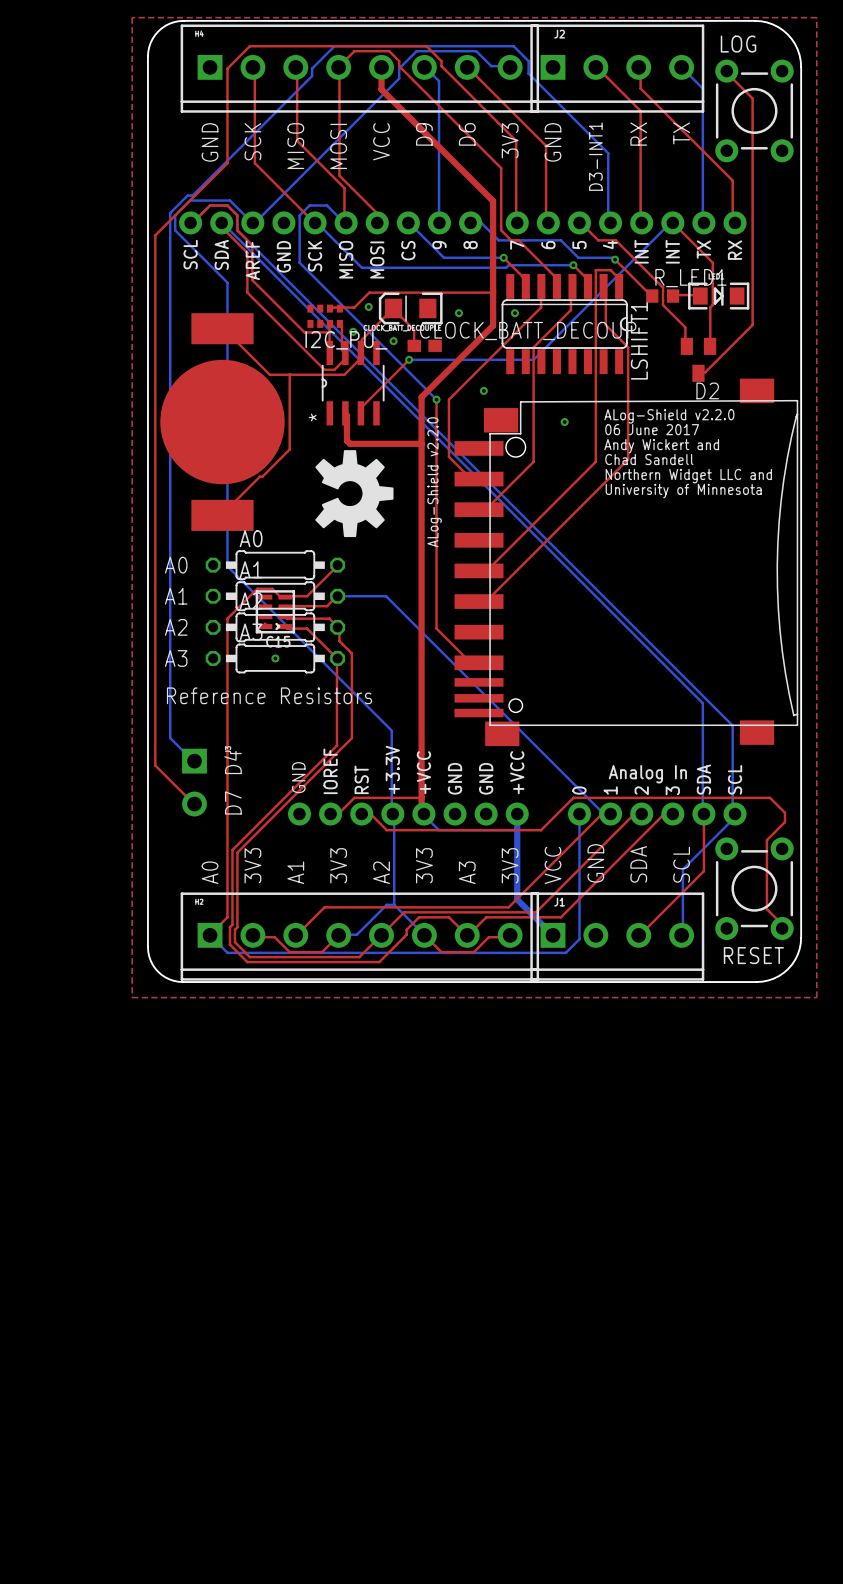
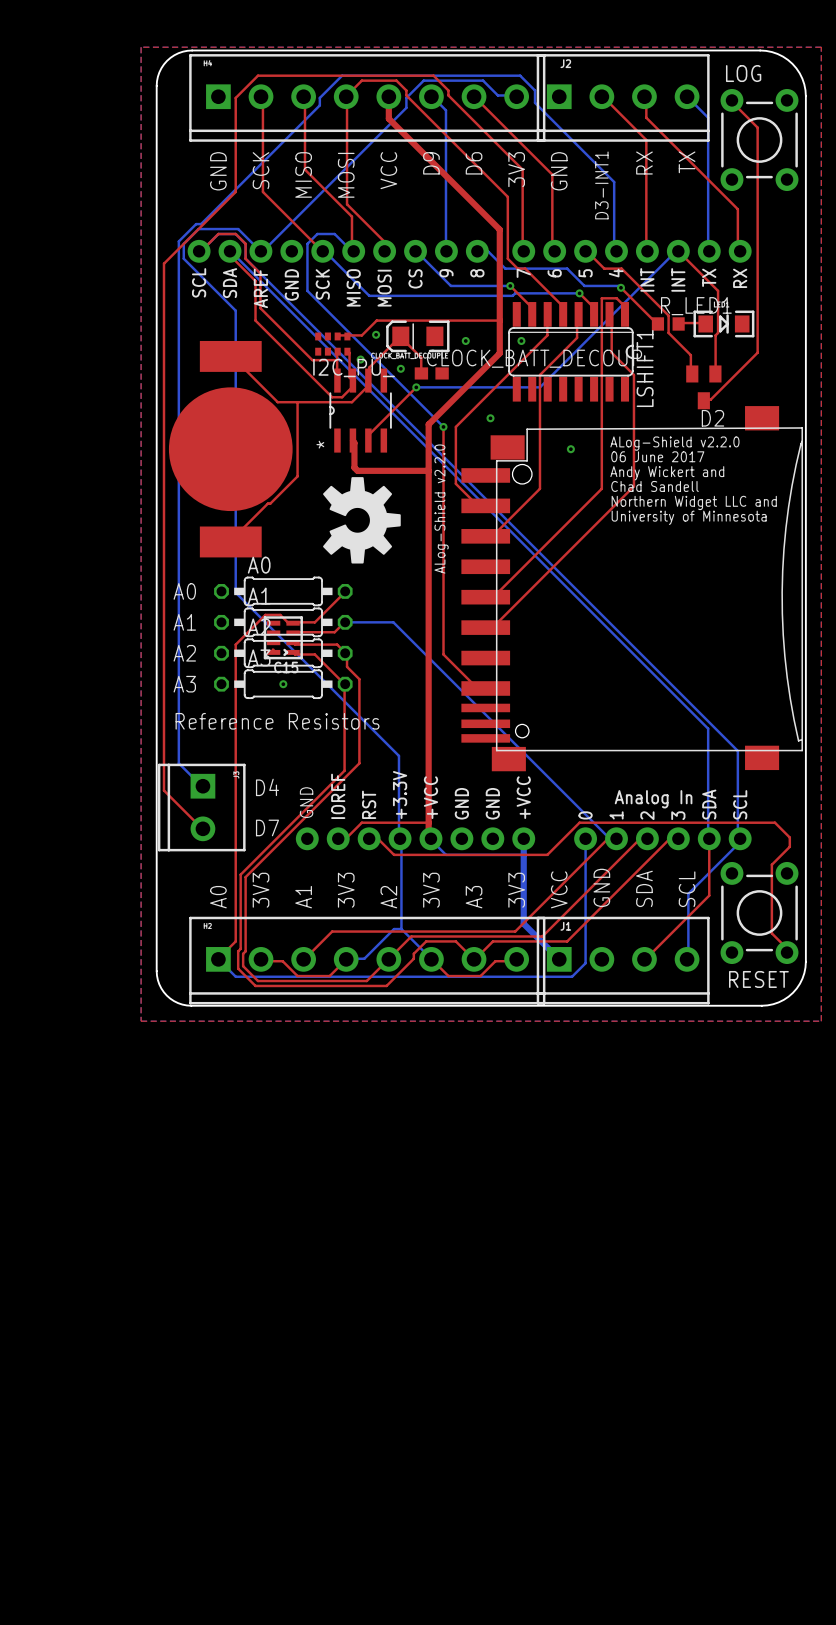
part footprint: [182, 748, 207, 817] -> [157, 763, 246, 852]
text rotation: 0° (233, 762) -> 90° clockwise (267, 787)
text rotation: 0° (233, 802) -> 90° clockwise (267, 827)

